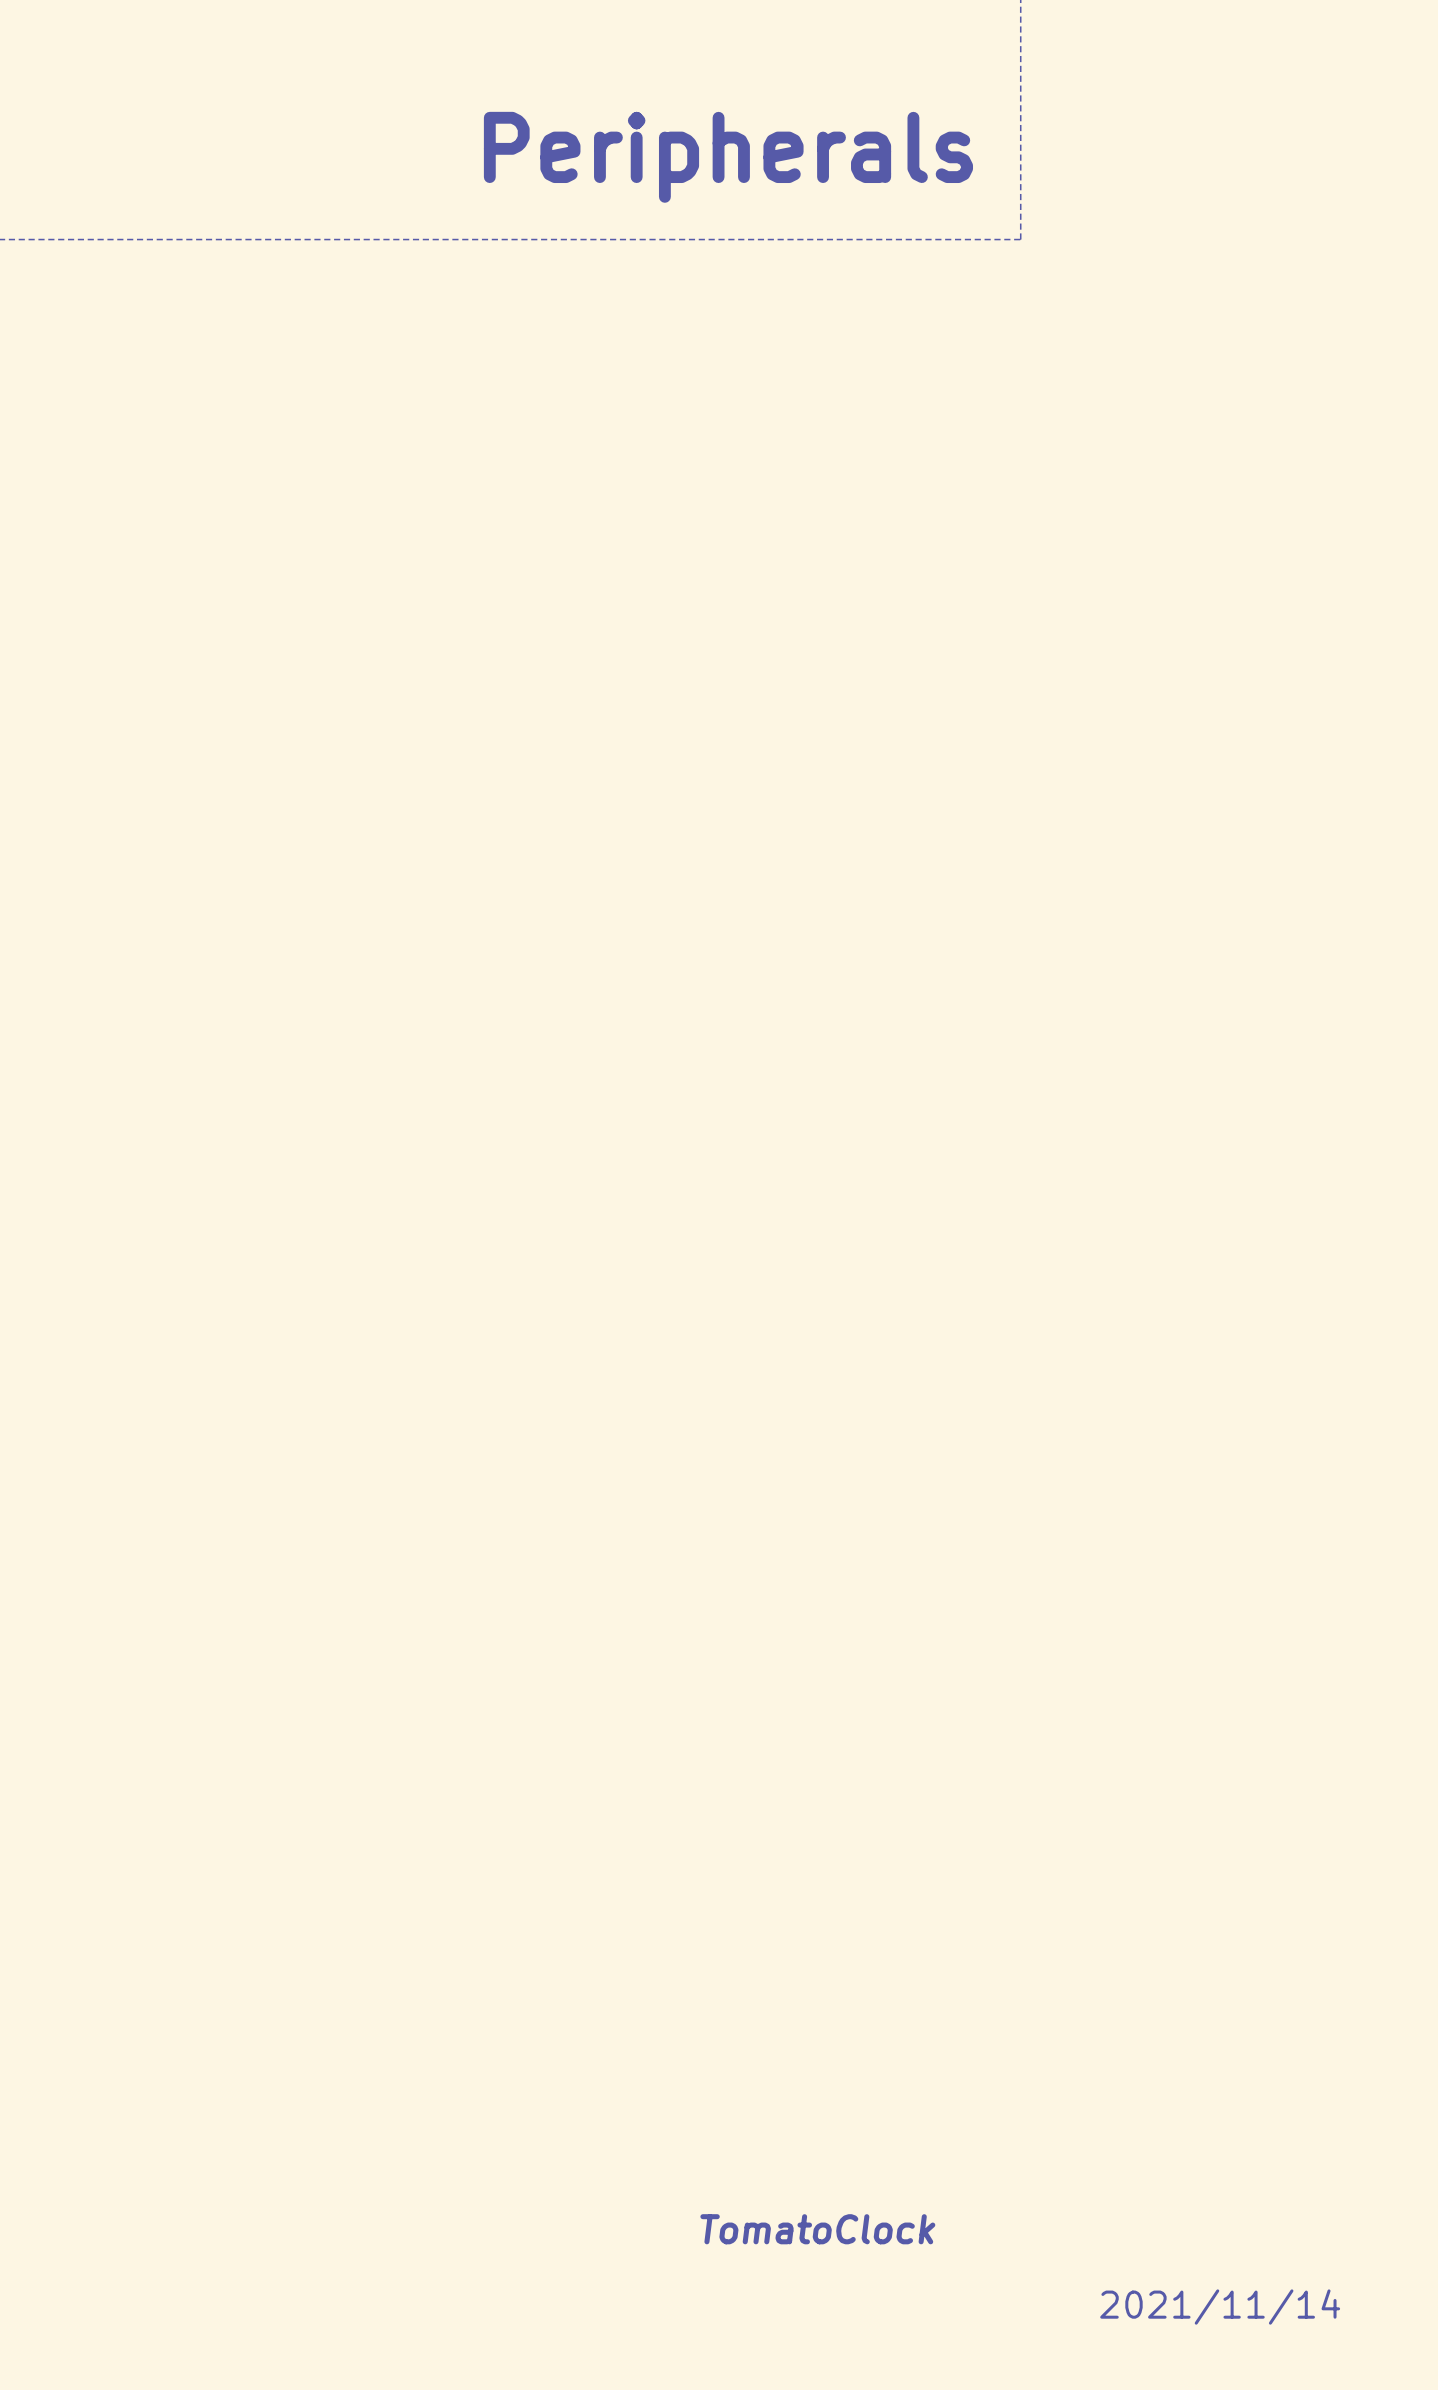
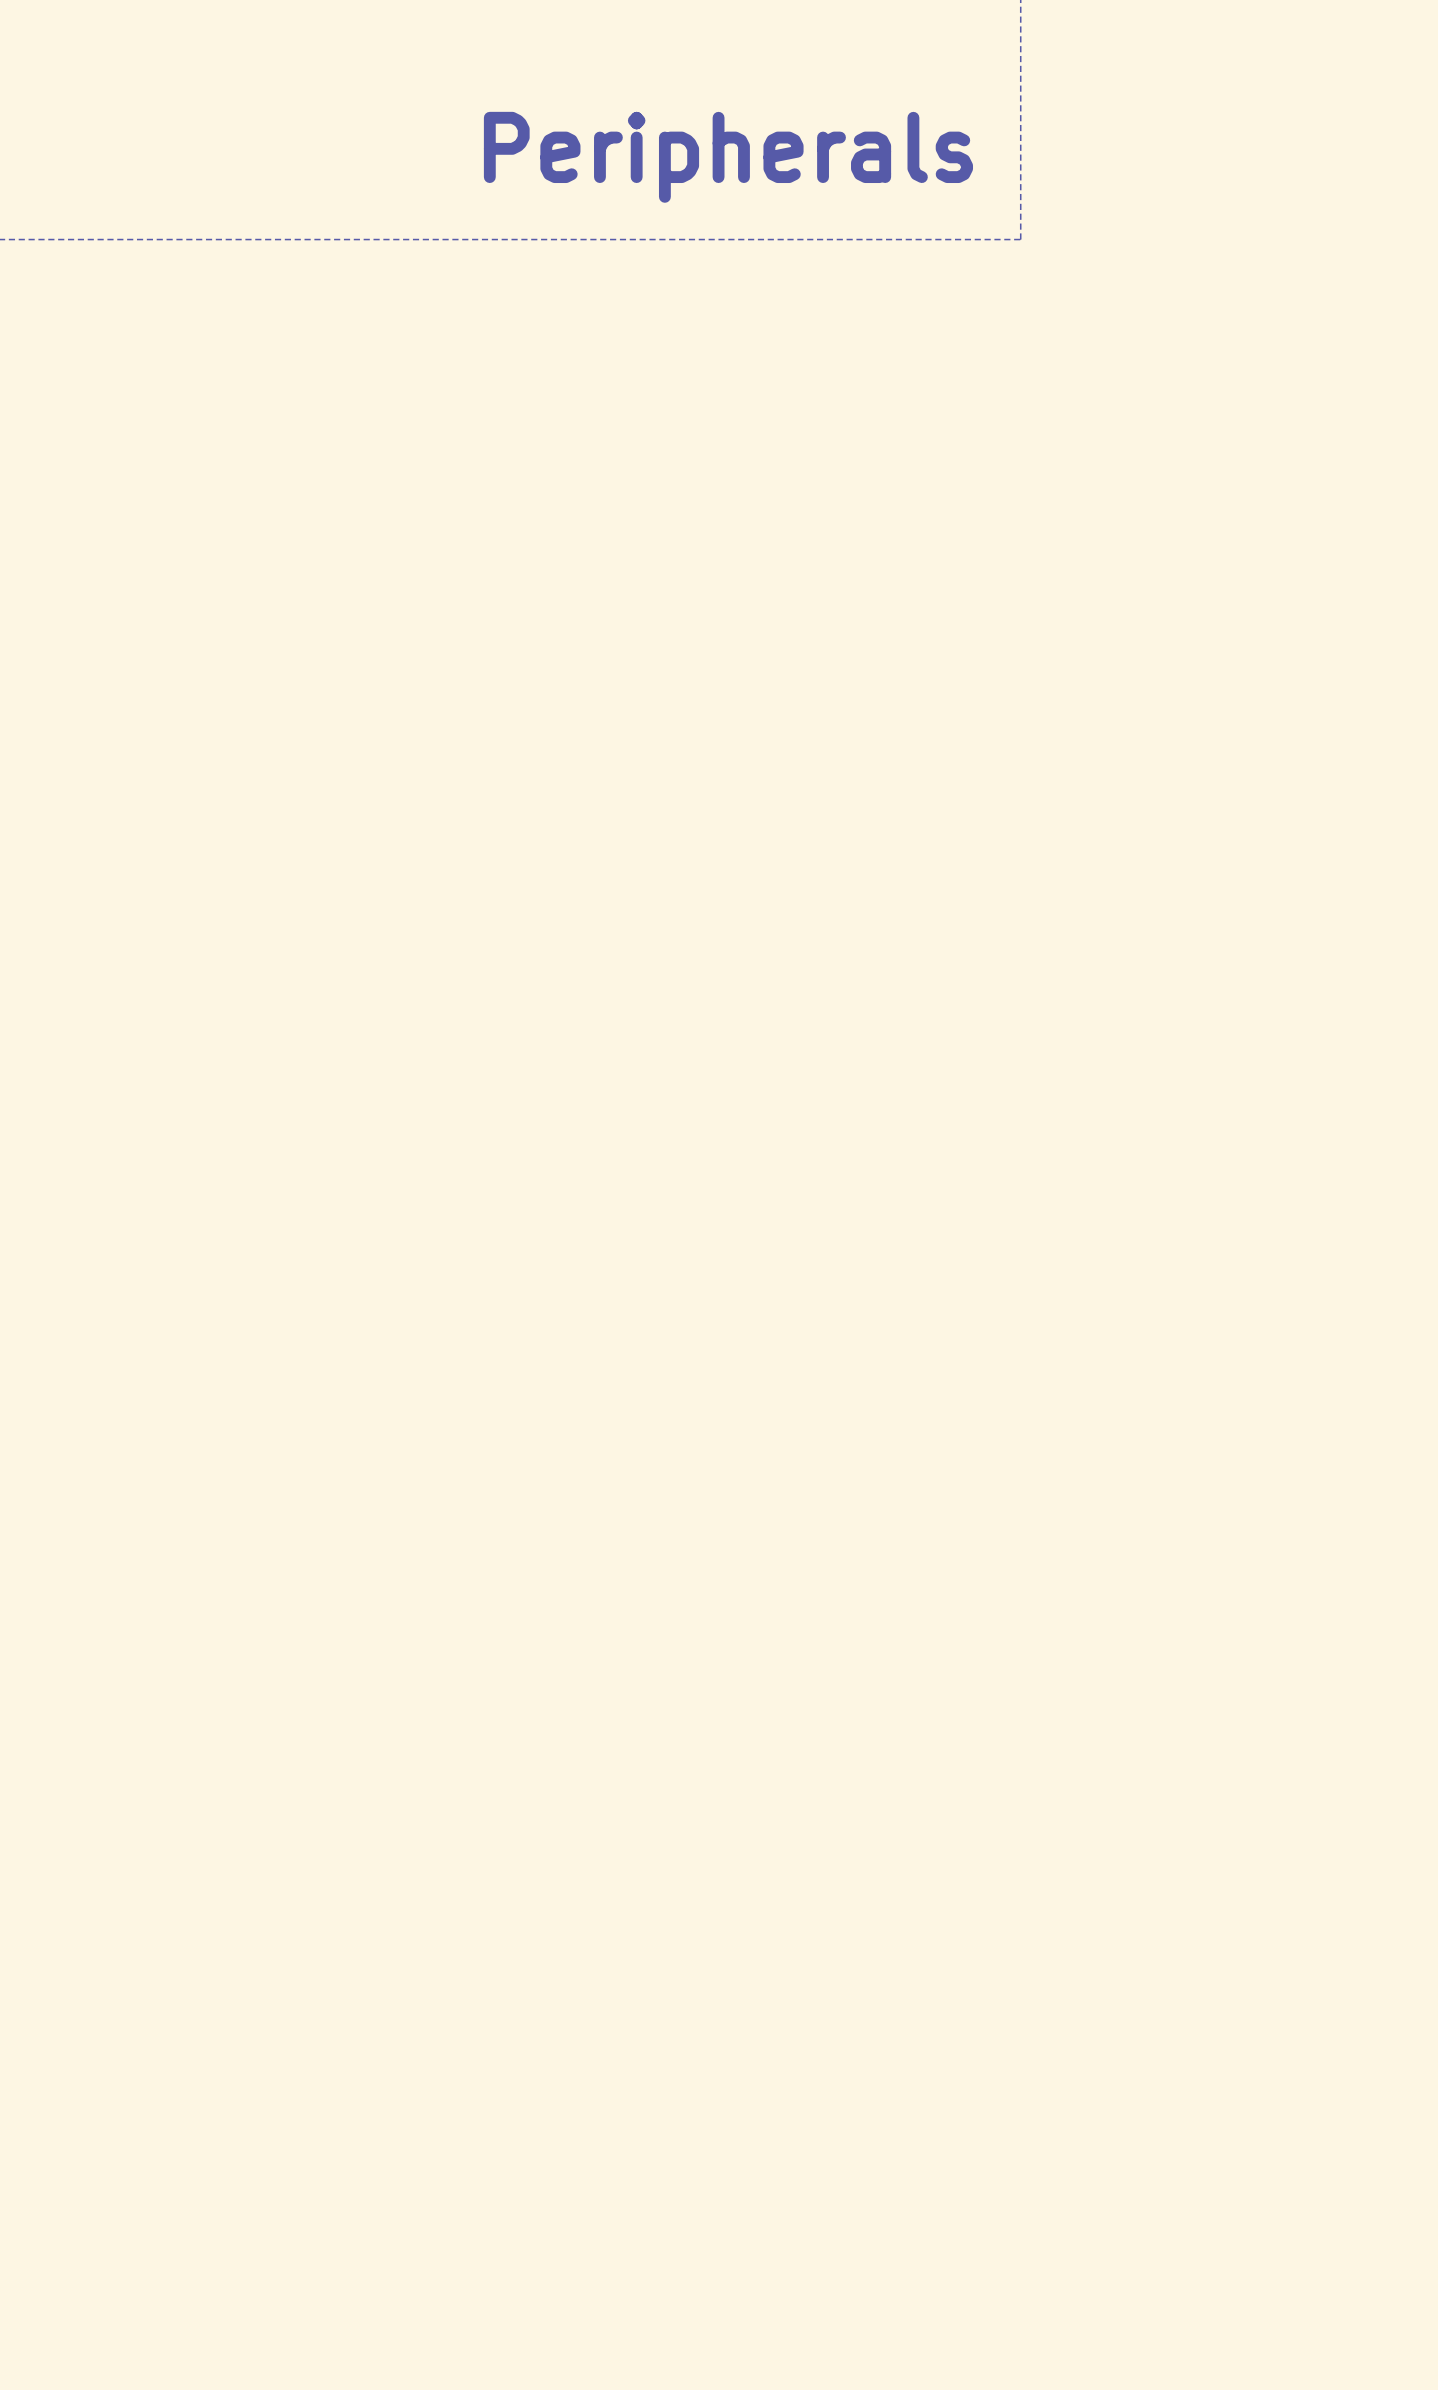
text: TomatoClock (817, 2229) -> none
text: 2021/11/14 (1220, 2307) -> none

